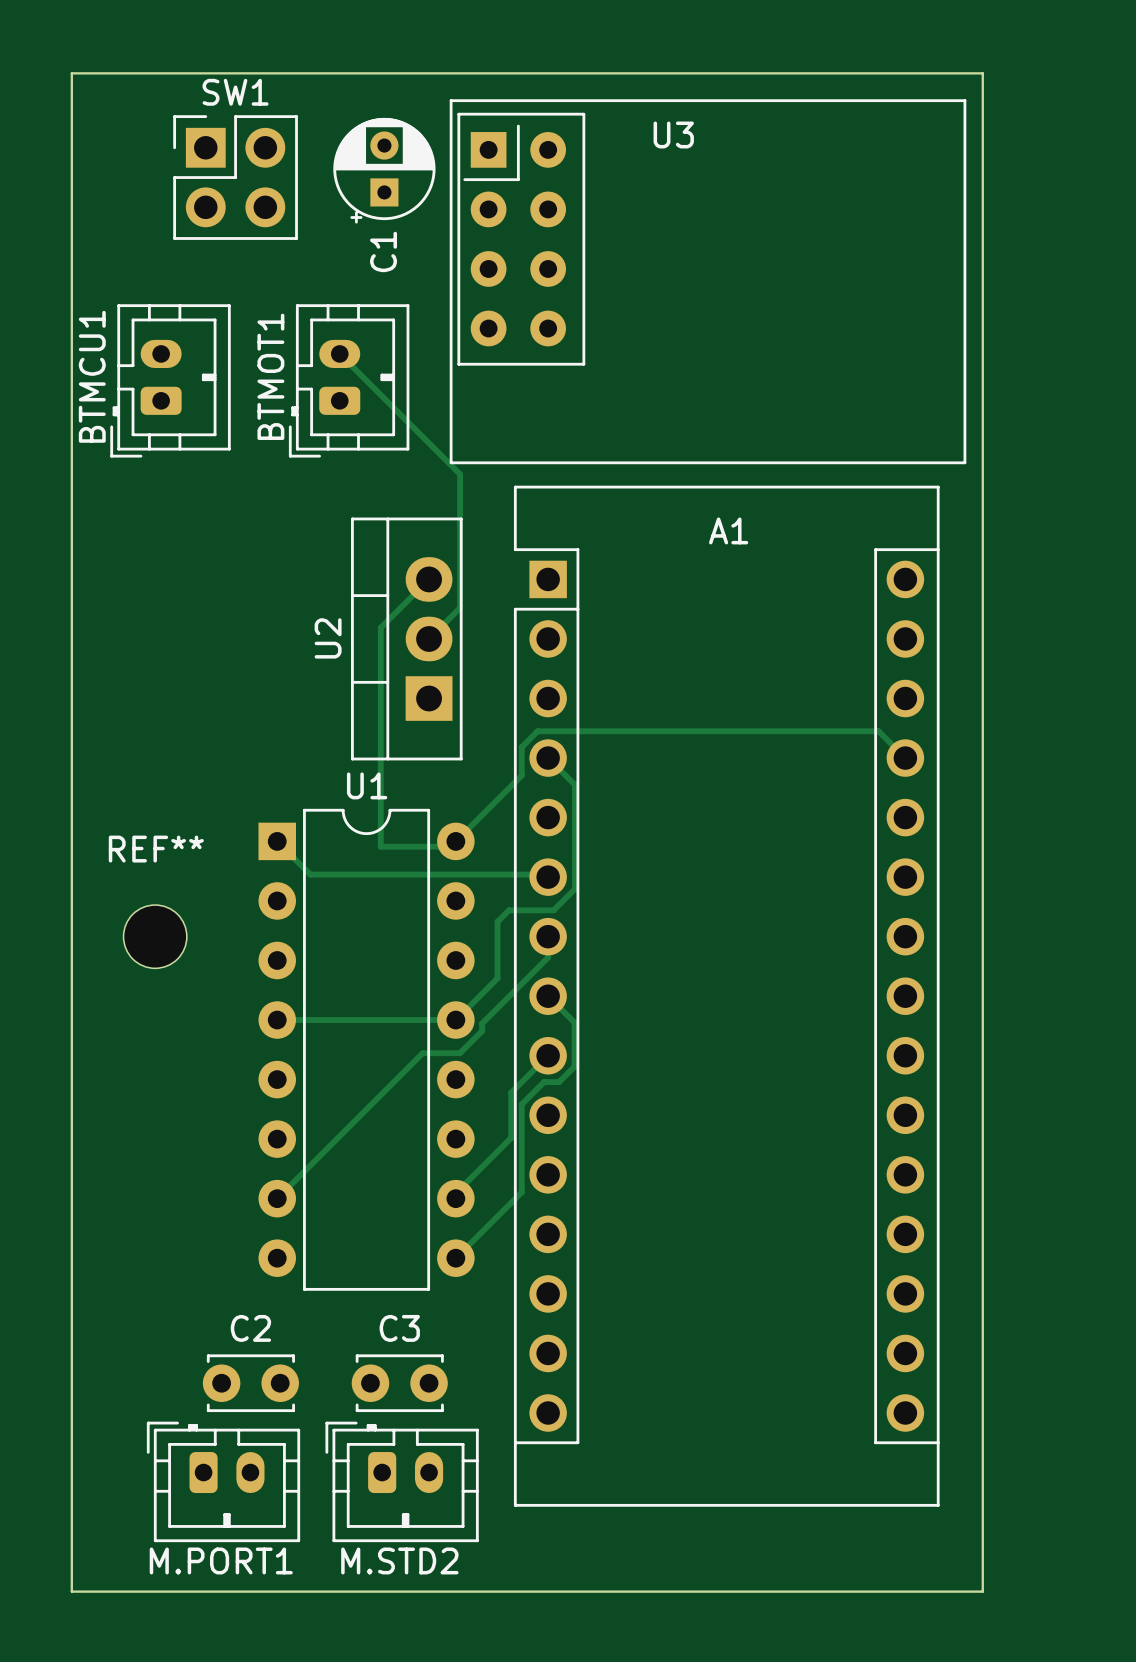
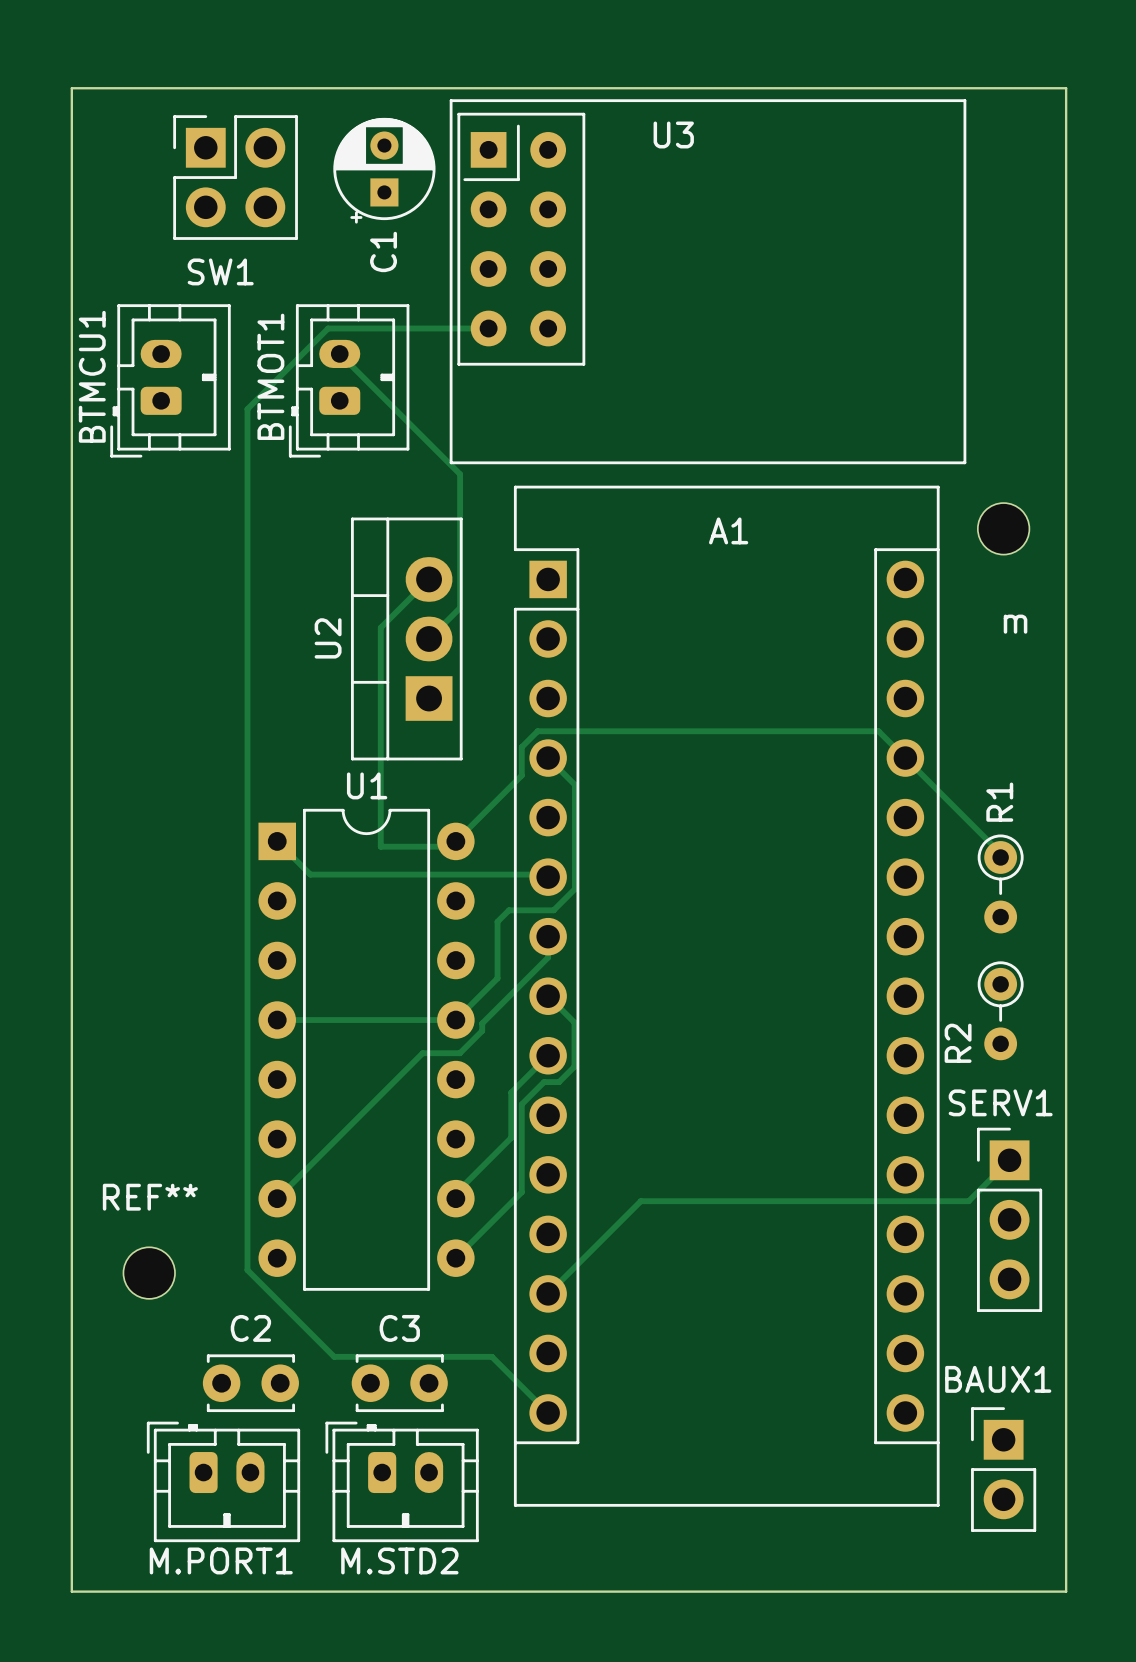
board edge: (71, 88) (71, 73) (982, 73) (982, 1591) -> (71, 88) (1066, 88) (1066, 1591) (982, 1591)
SW1 name position: SW1 (235, 92) -> SW1 (220, 271)
track: none -> (488, 328) (328, 328) (247, 409) (247, 1270) (334, 1356) (492, 1356) (548, 1412)
m: none -> (1003, 528)
track: none -> (905, 758) (1000, 853) (1000, 857)
R1: none -> (1000, 883)
REF**: (155, 936) -> none
R2: none -> (1000, 1010)
track: none -> (1009, 1160) (968, 1201) (640, 1201) (548, 1293)
SERV1: none -> (1009, 1219)
REF**: none -> (149, 1273)
BAUX1: none -> (1003, 1469)

